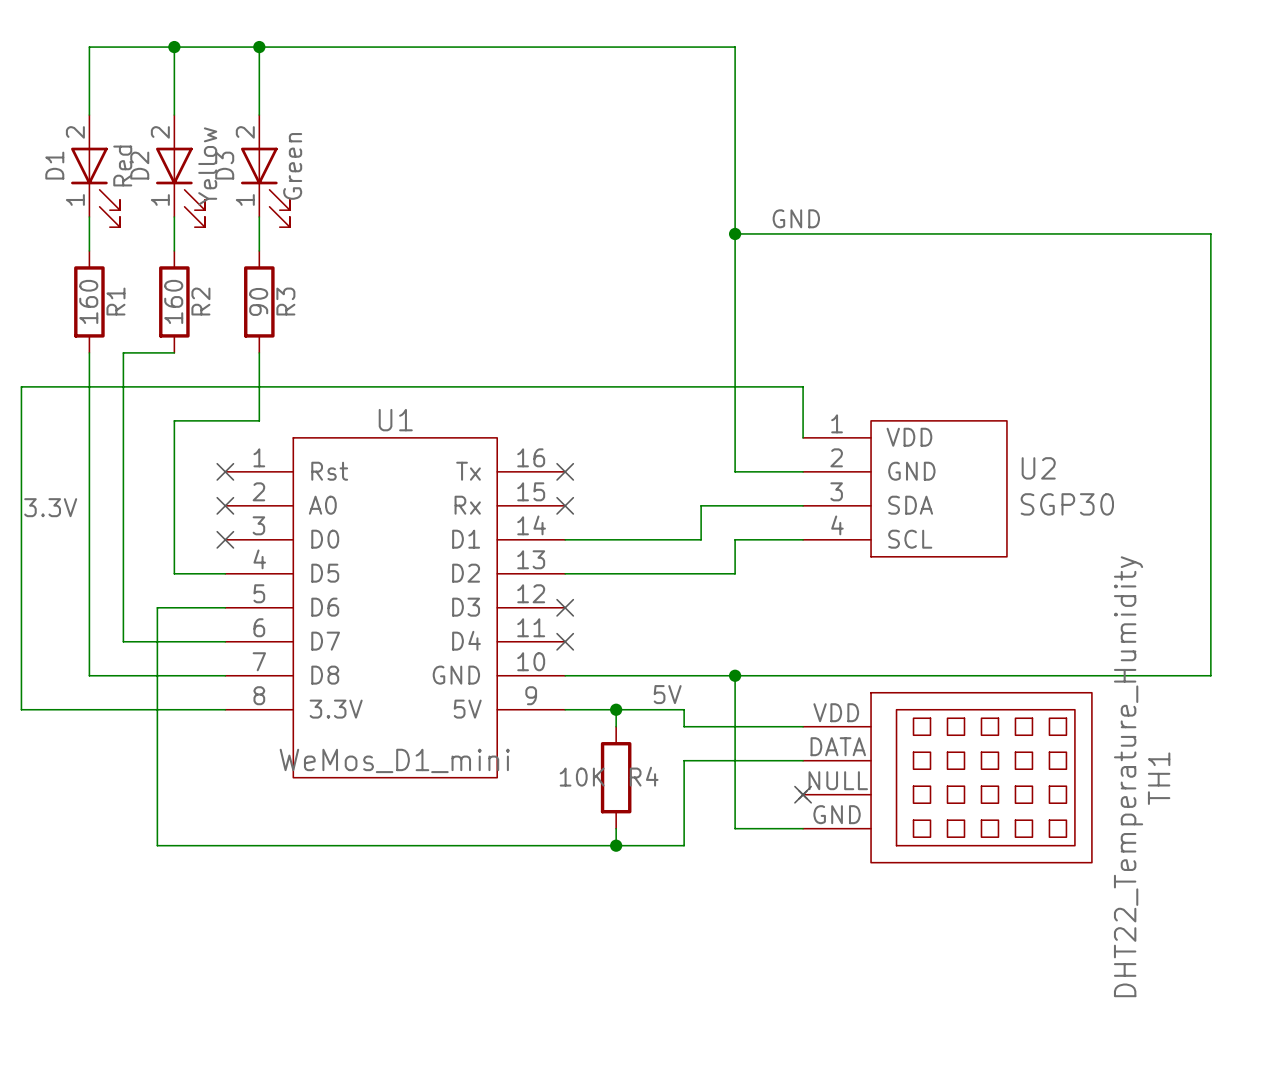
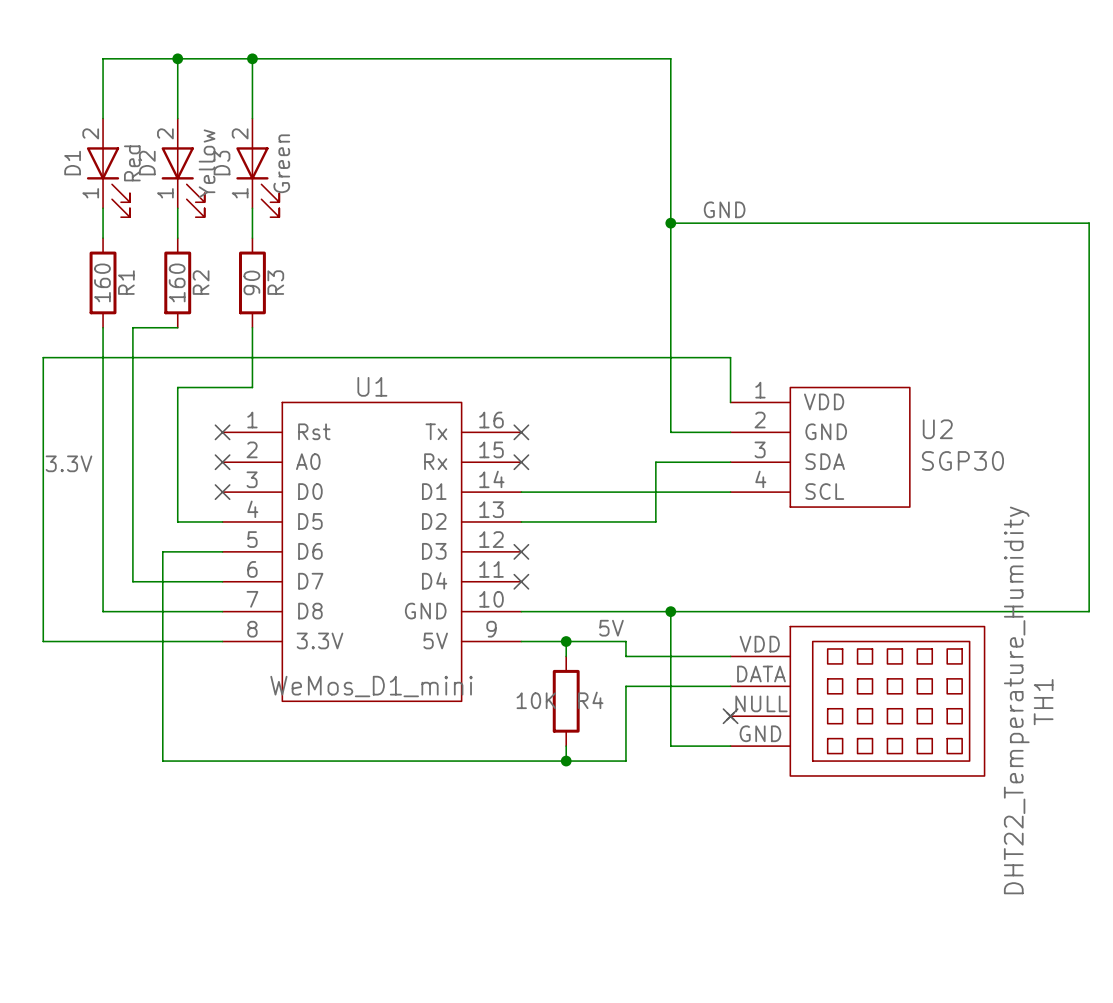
wire: (718, 505) (701, 505) (701, 539) -> (655, 462) (655, 521)
wire: (735, 539) (735, 573) (718, 573) -> (670, 492) (640, 492)

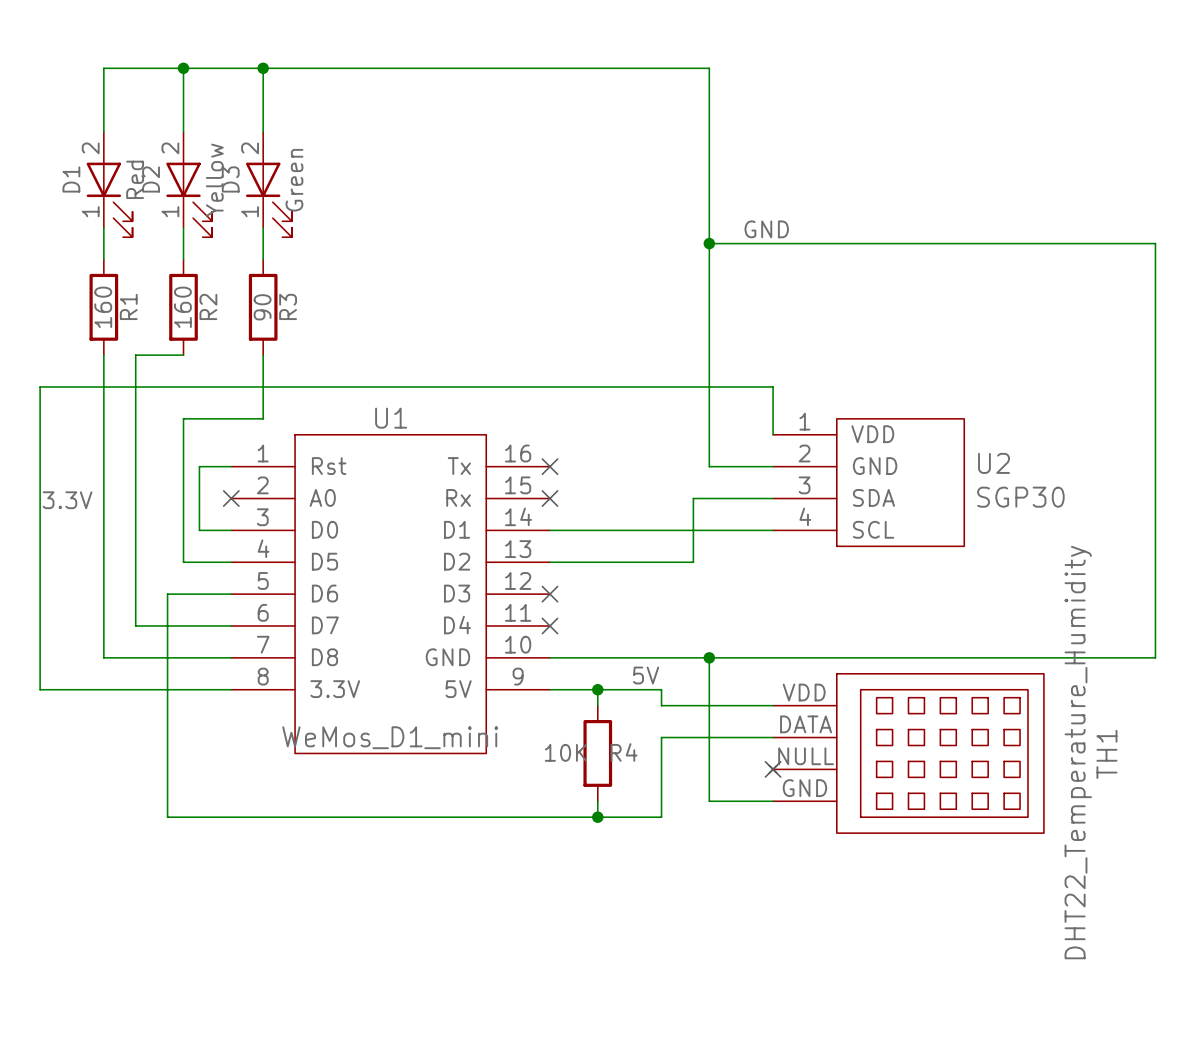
wire: none -> (231, 466) (199, 466) (199, 530) (231, 530)
no-connect mark: (222, 432) -> none
no-connect mark: (222, 492) -> none

